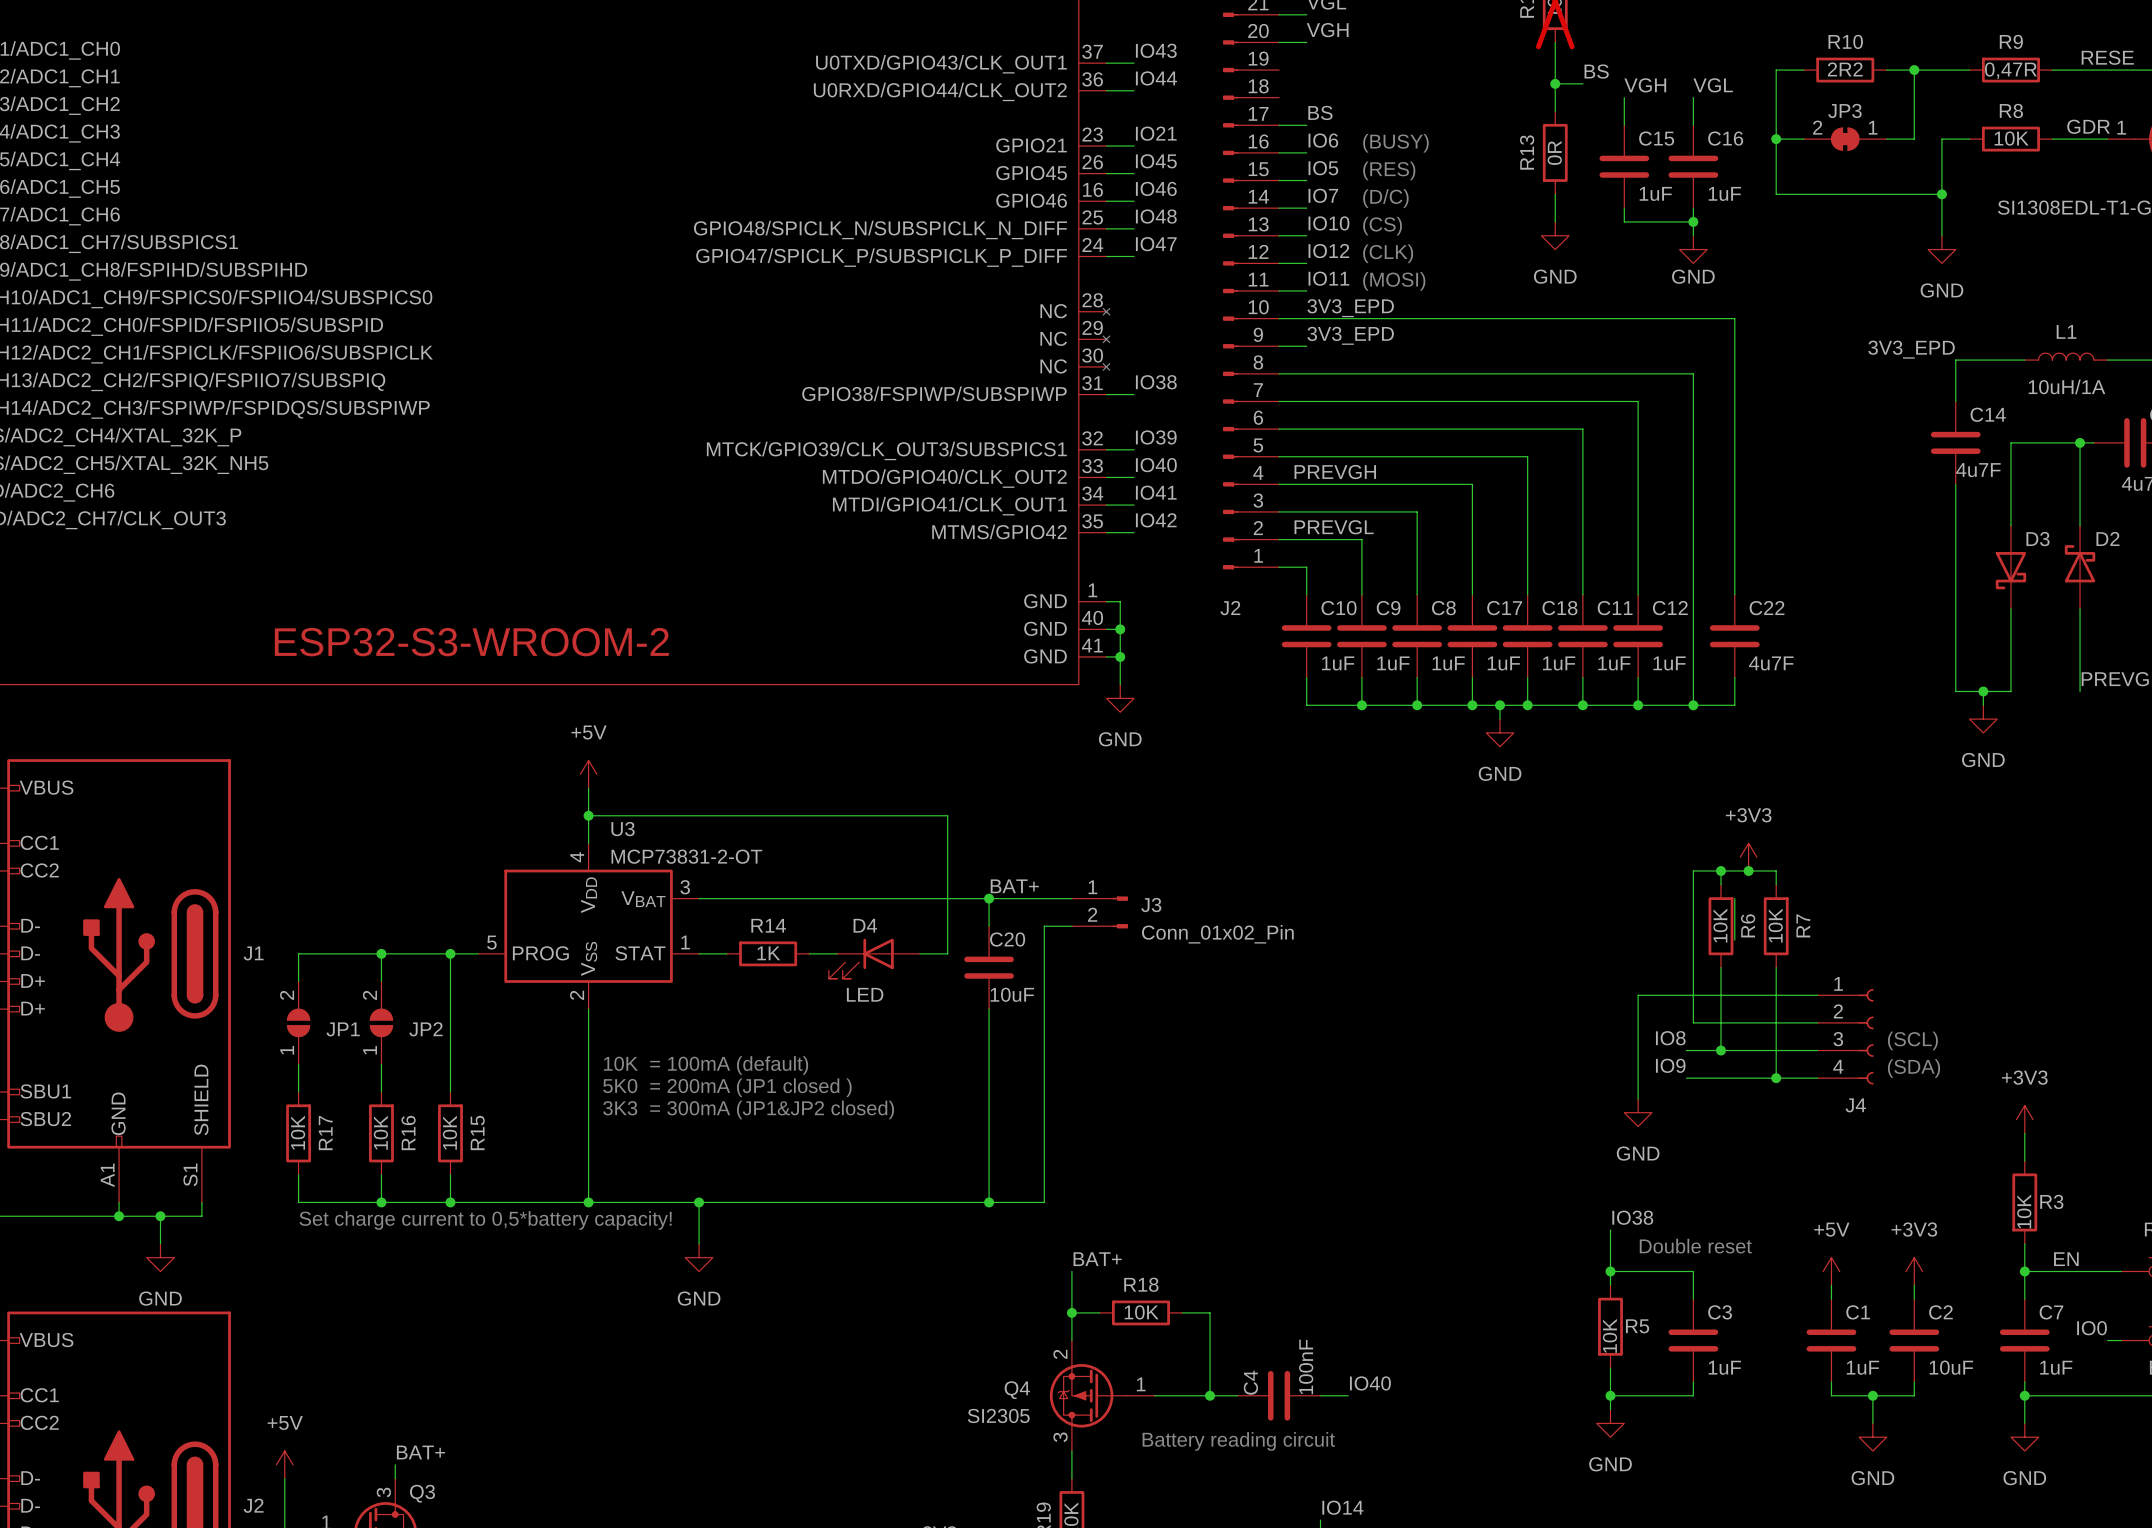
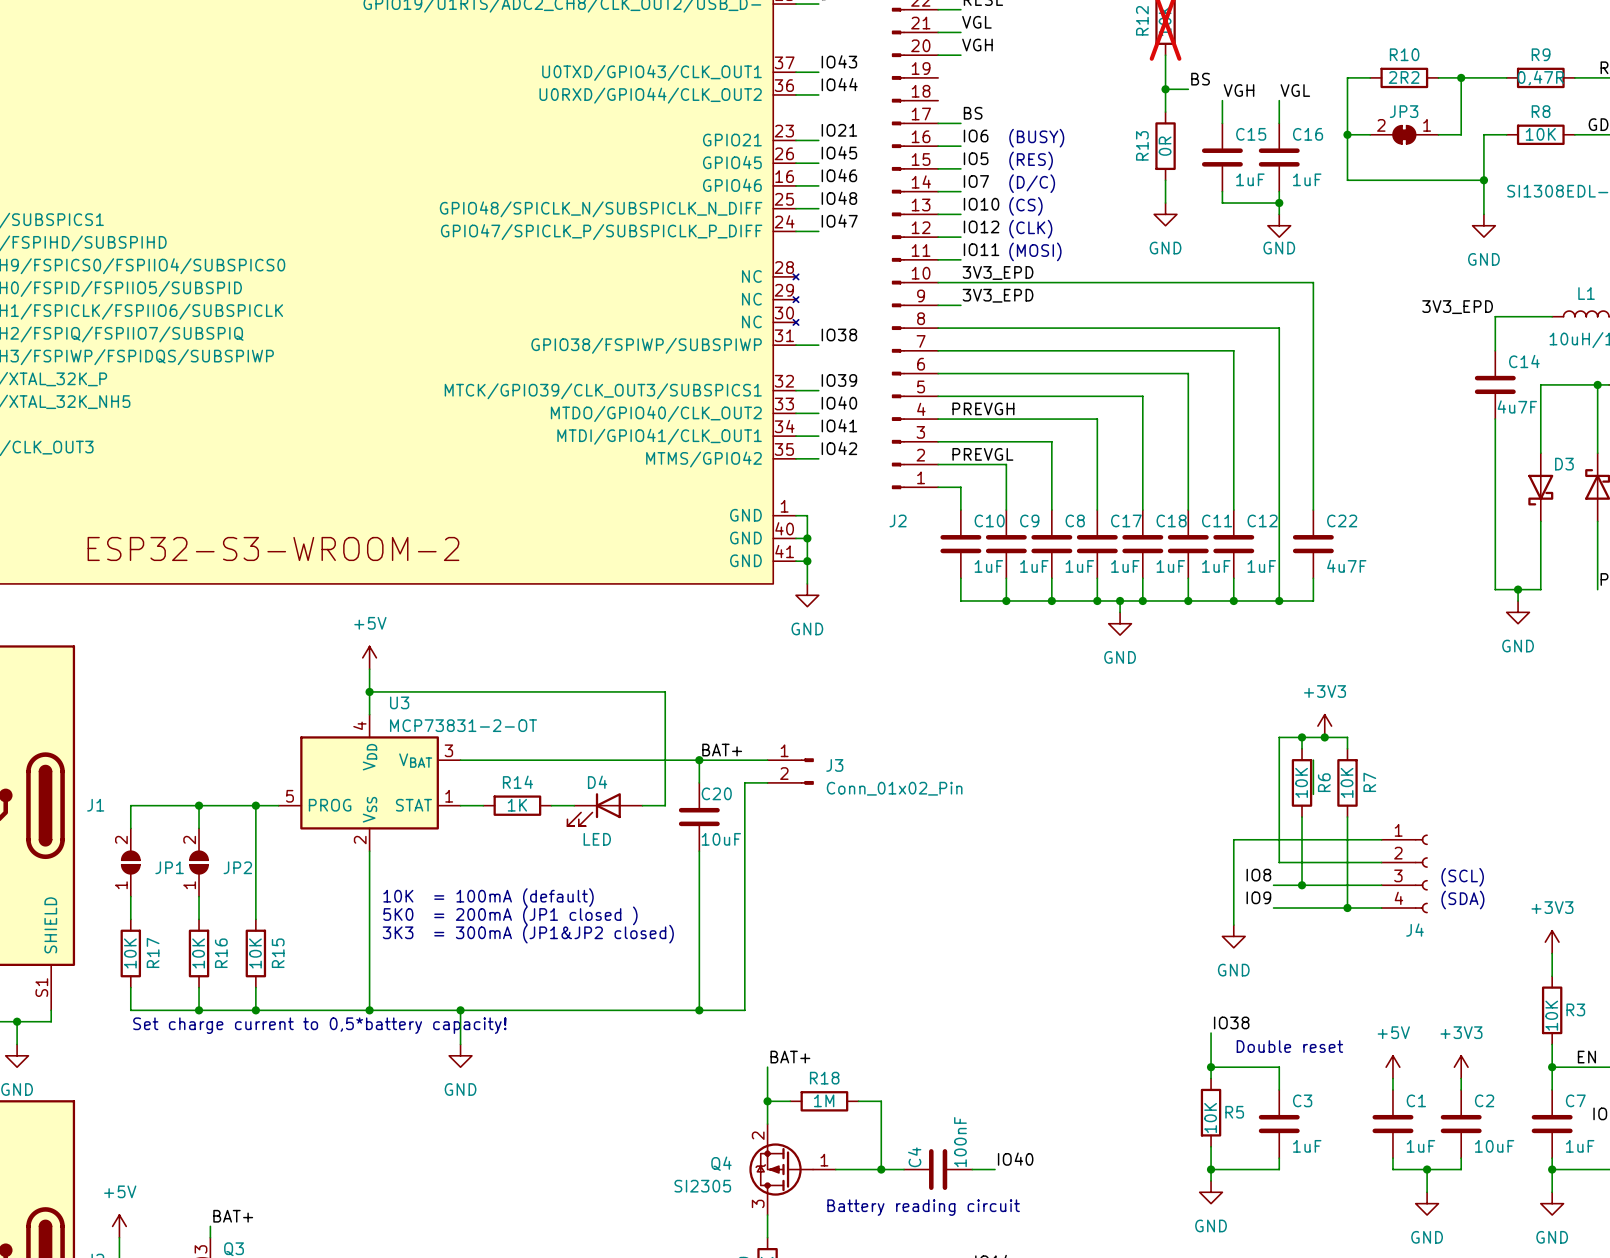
R18 value: 10K (1141, 1312) -> 1M (824, 1100)

